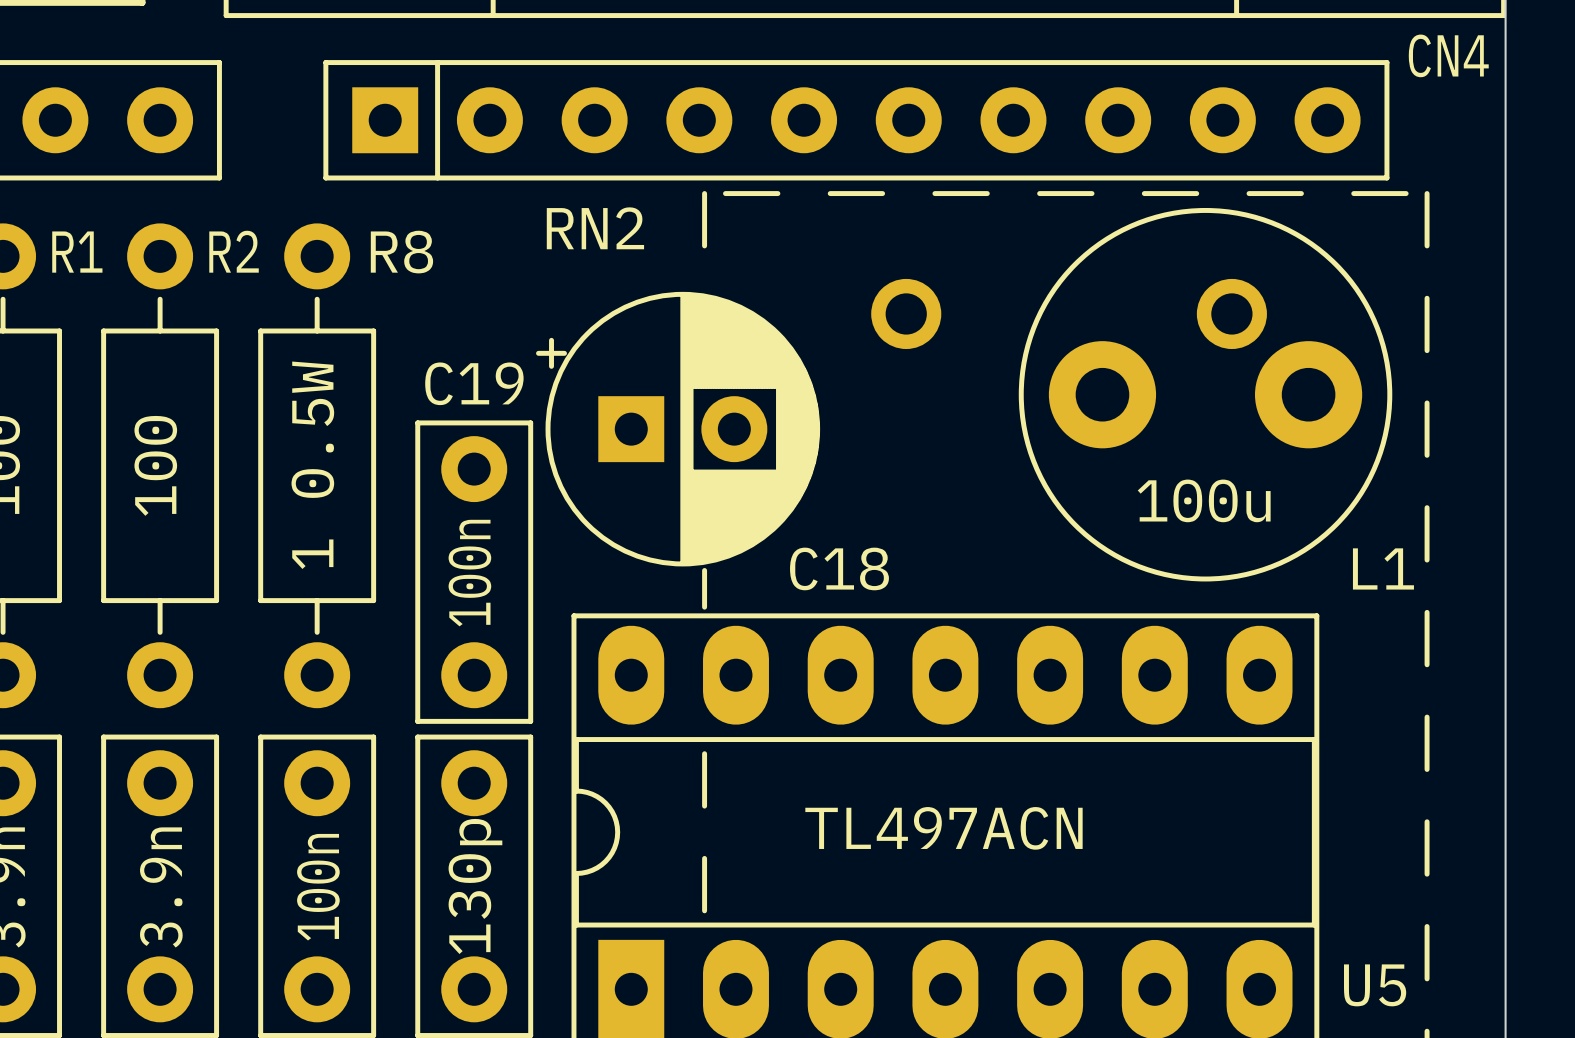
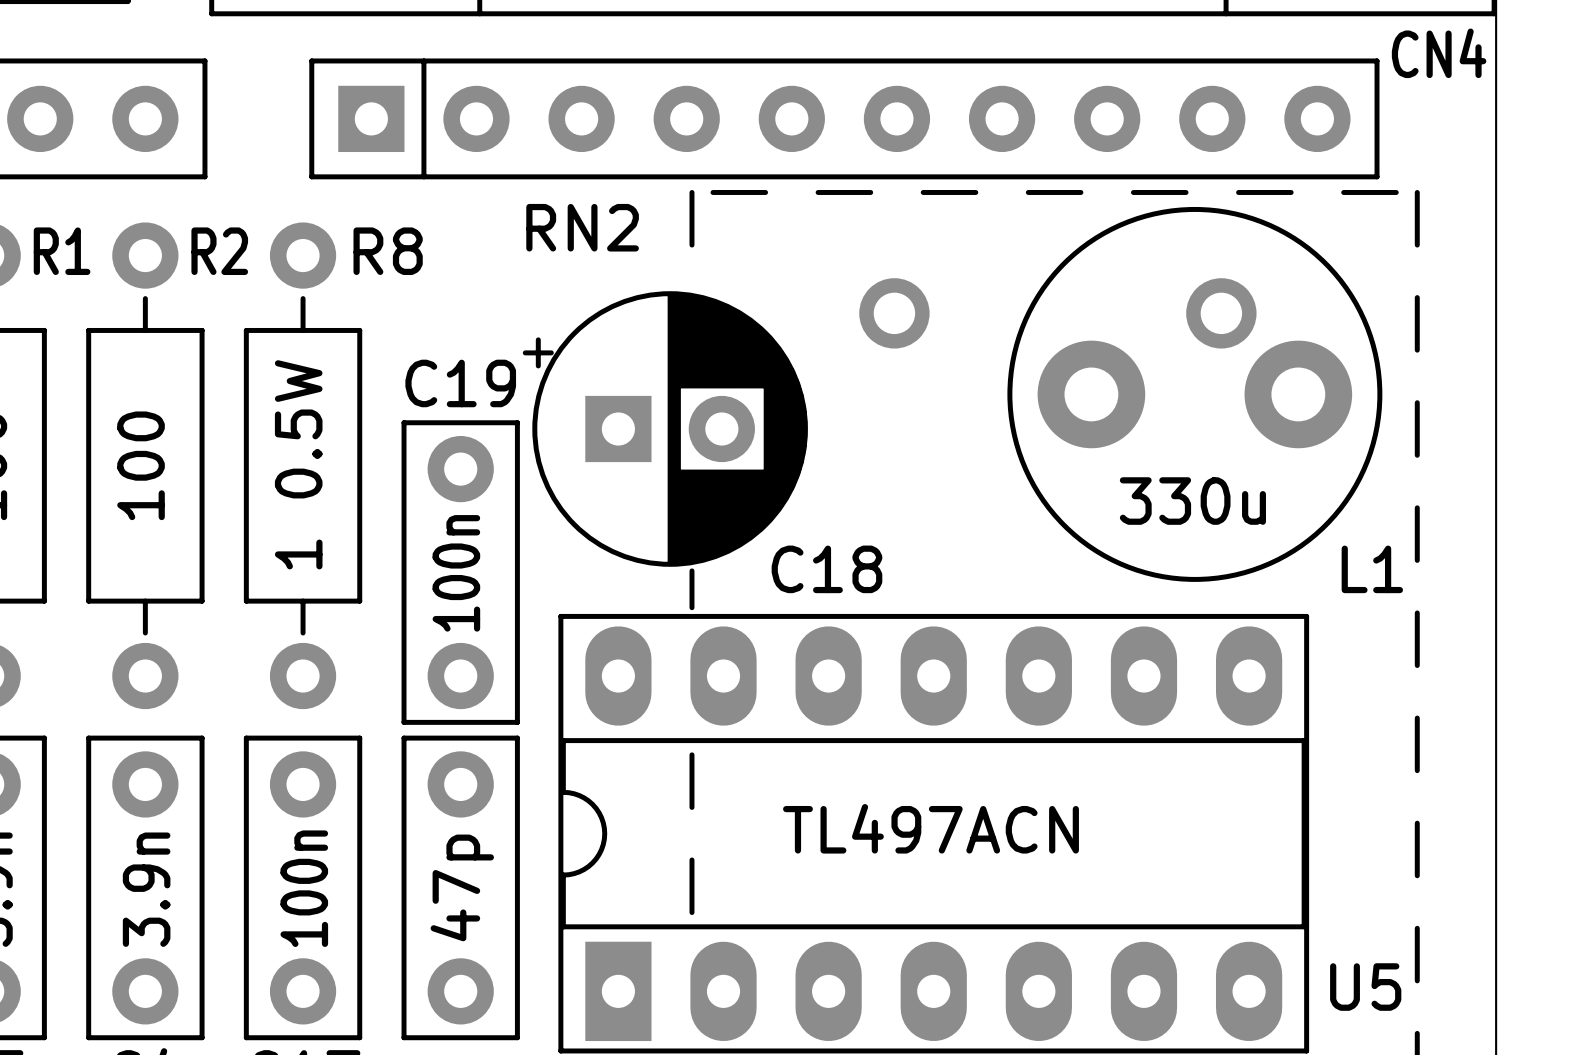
L1 value: 100u (1204, 500) -> 330u (1192, 501)
part value: 130p (475, 886) -> 47p (462, 887)

